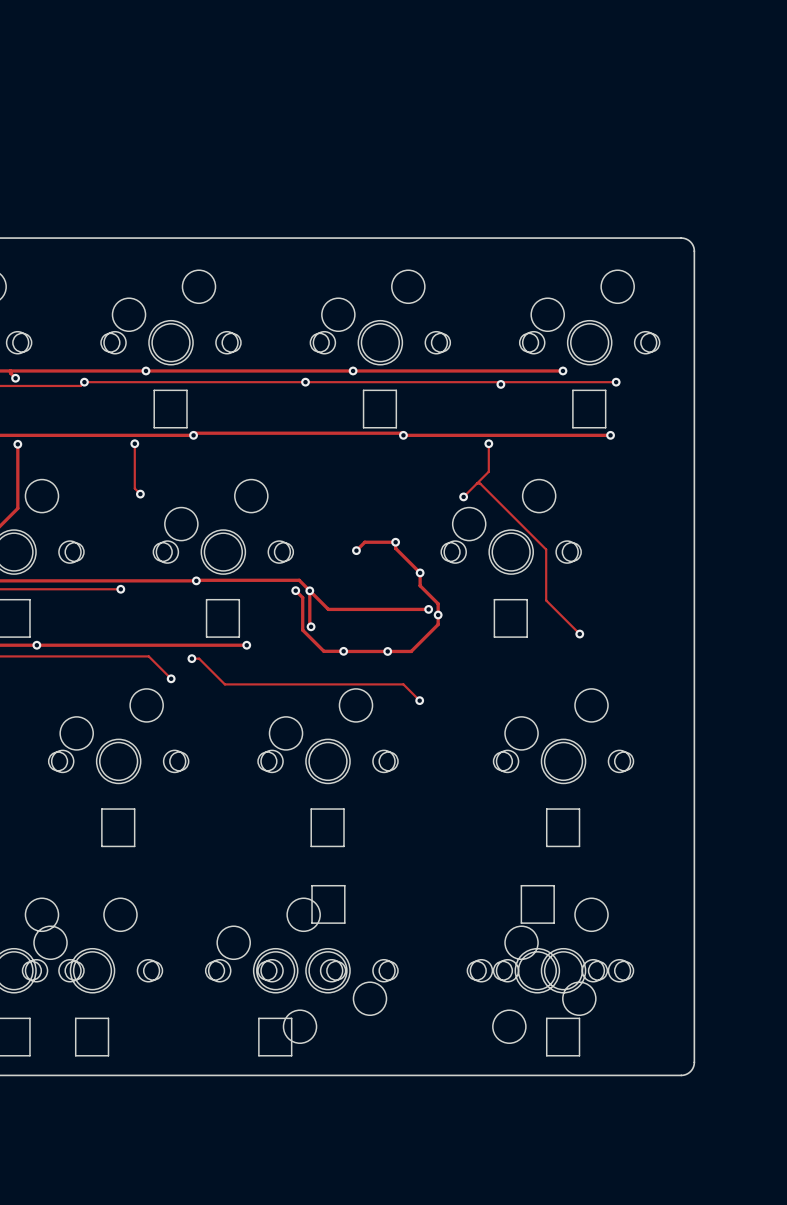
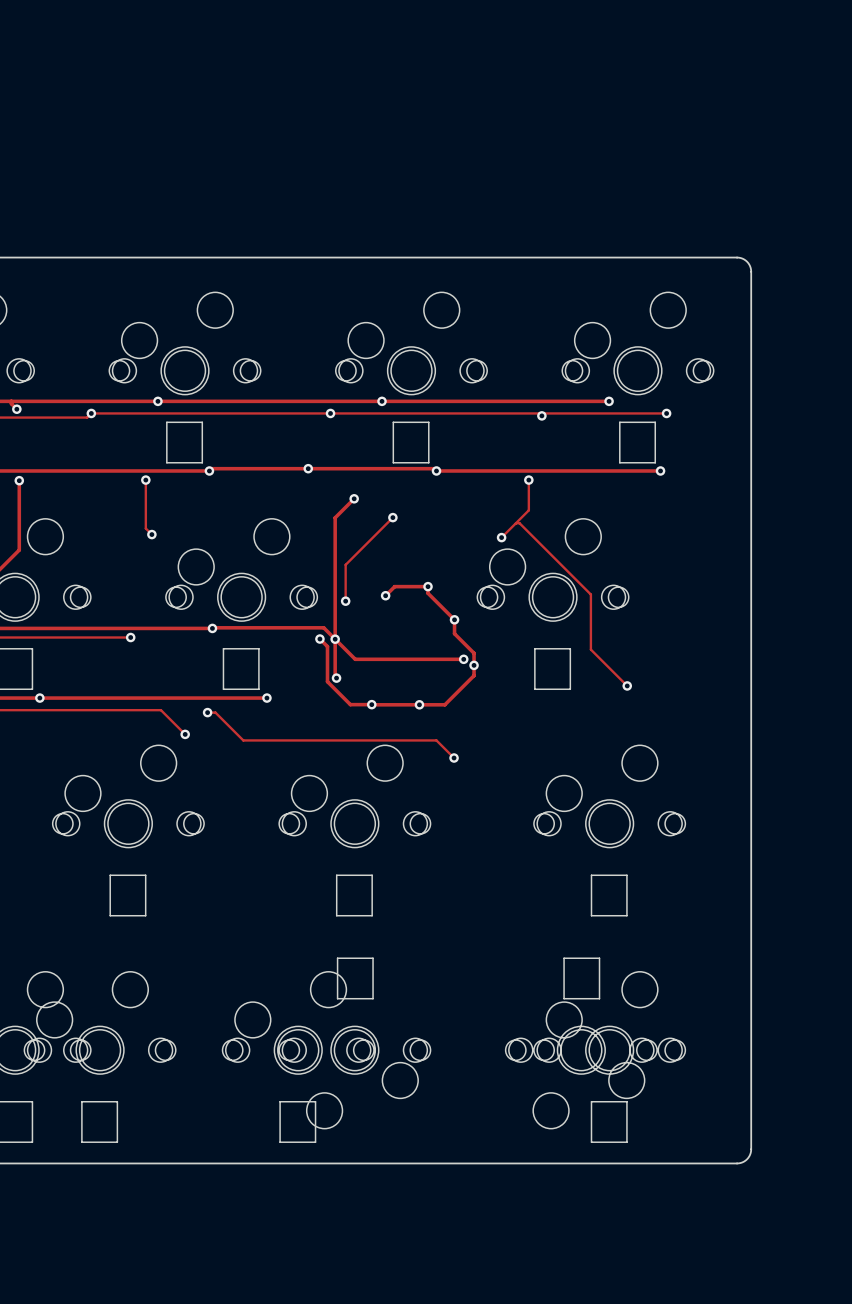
via: none -> (308, 468)
track: none -> (354, 498) (335, 517) (335, 639)
via: none -> (354, 498)
track: none -> (392, 517) (345, 564) (345, 601)
via: none -> (392, 517)
via: none -> (345, 601)

